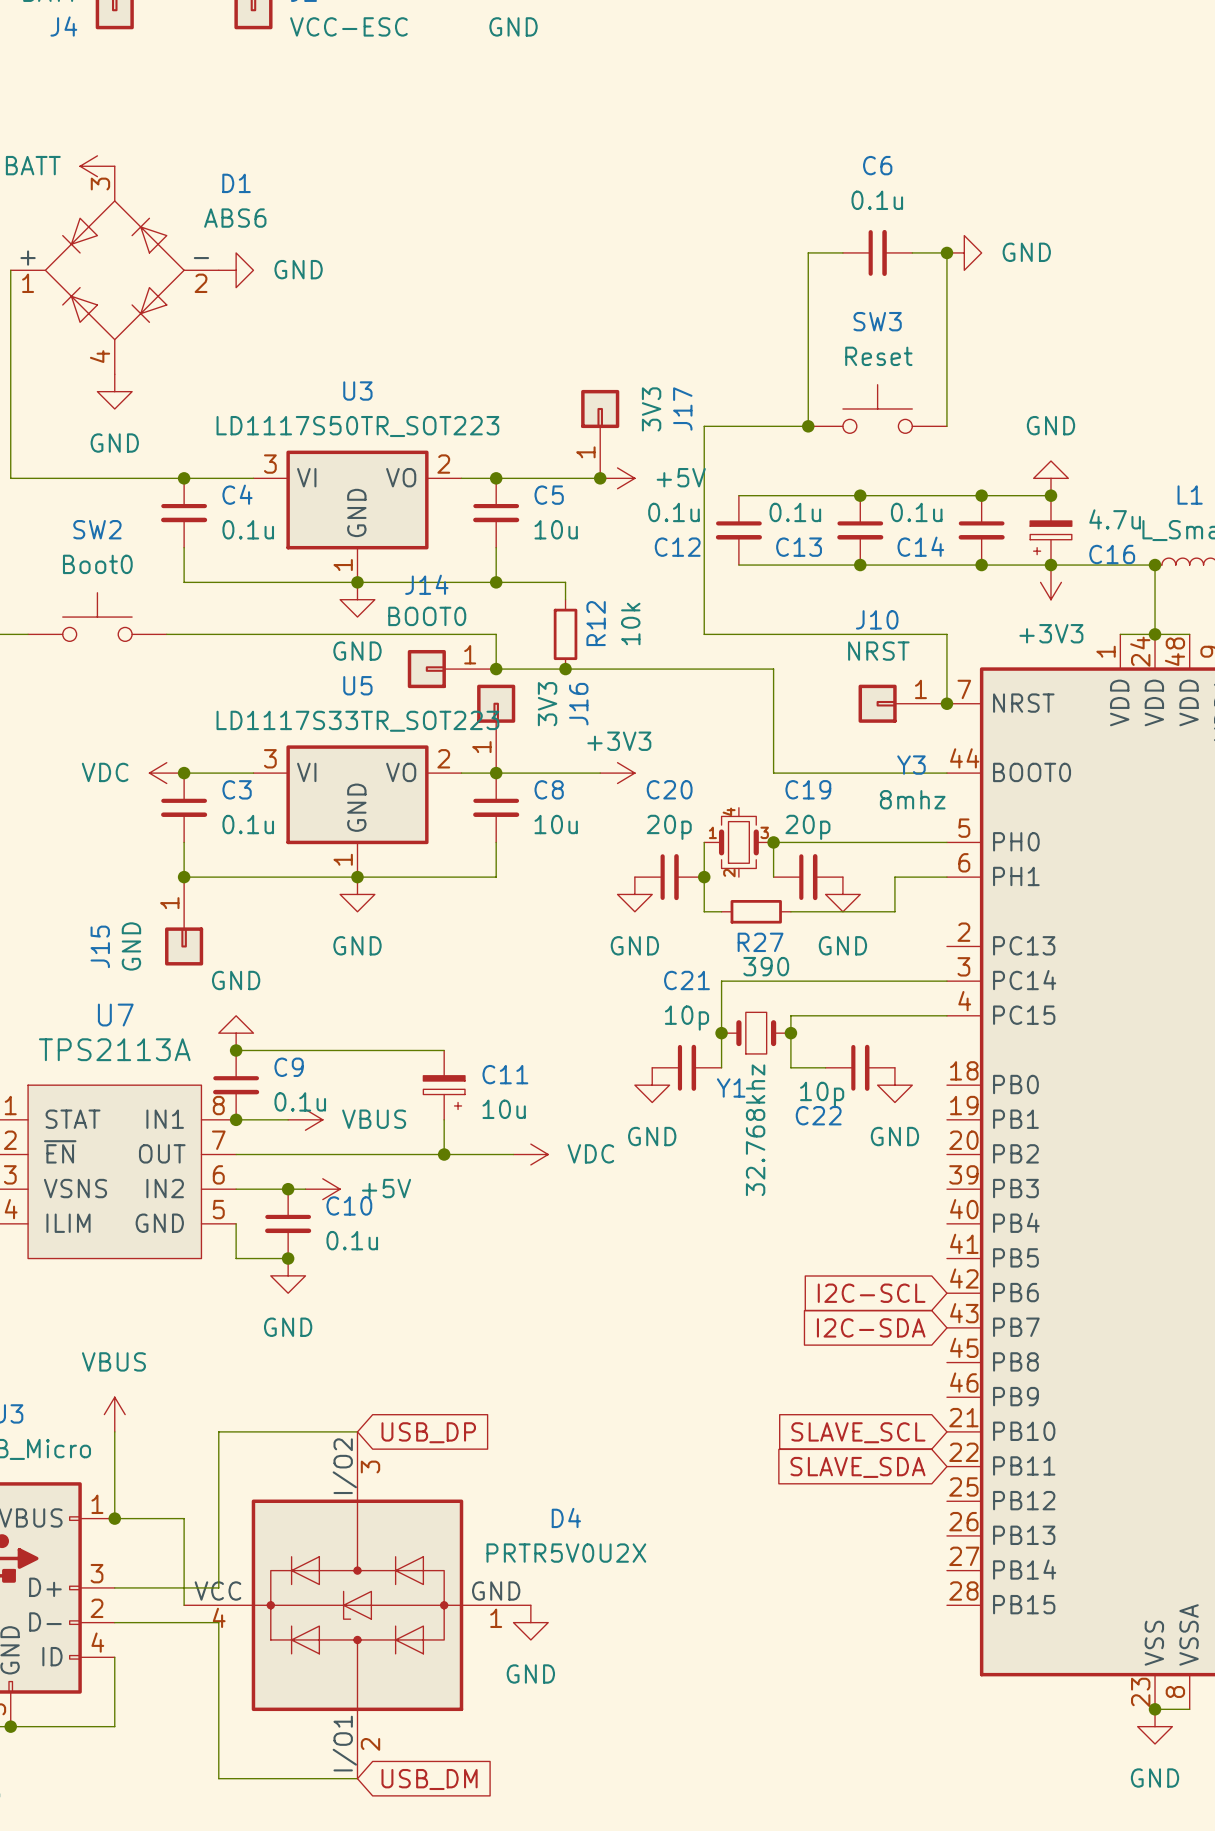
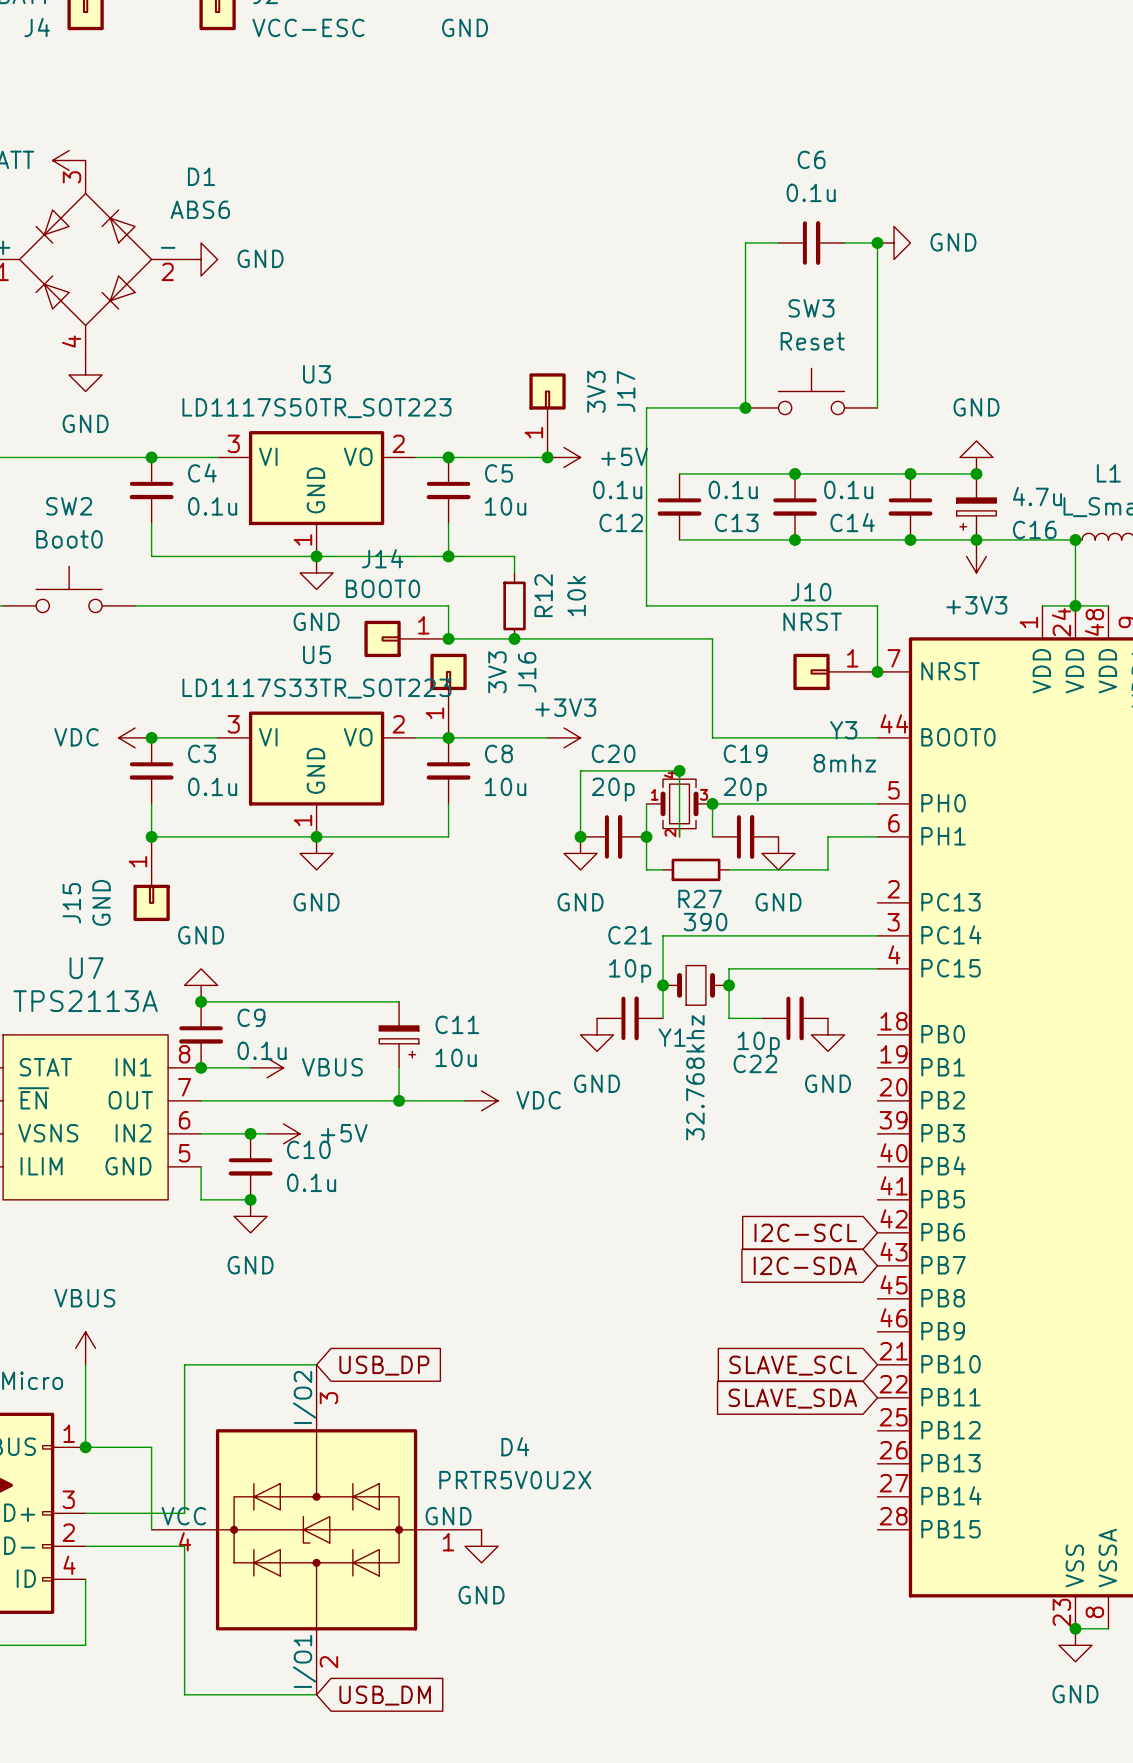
junction: none -> (679, 770)
wire: none -> (580, 836) (580, 770) (679, 770) (679, 836)
junction: none -> (580, 836)

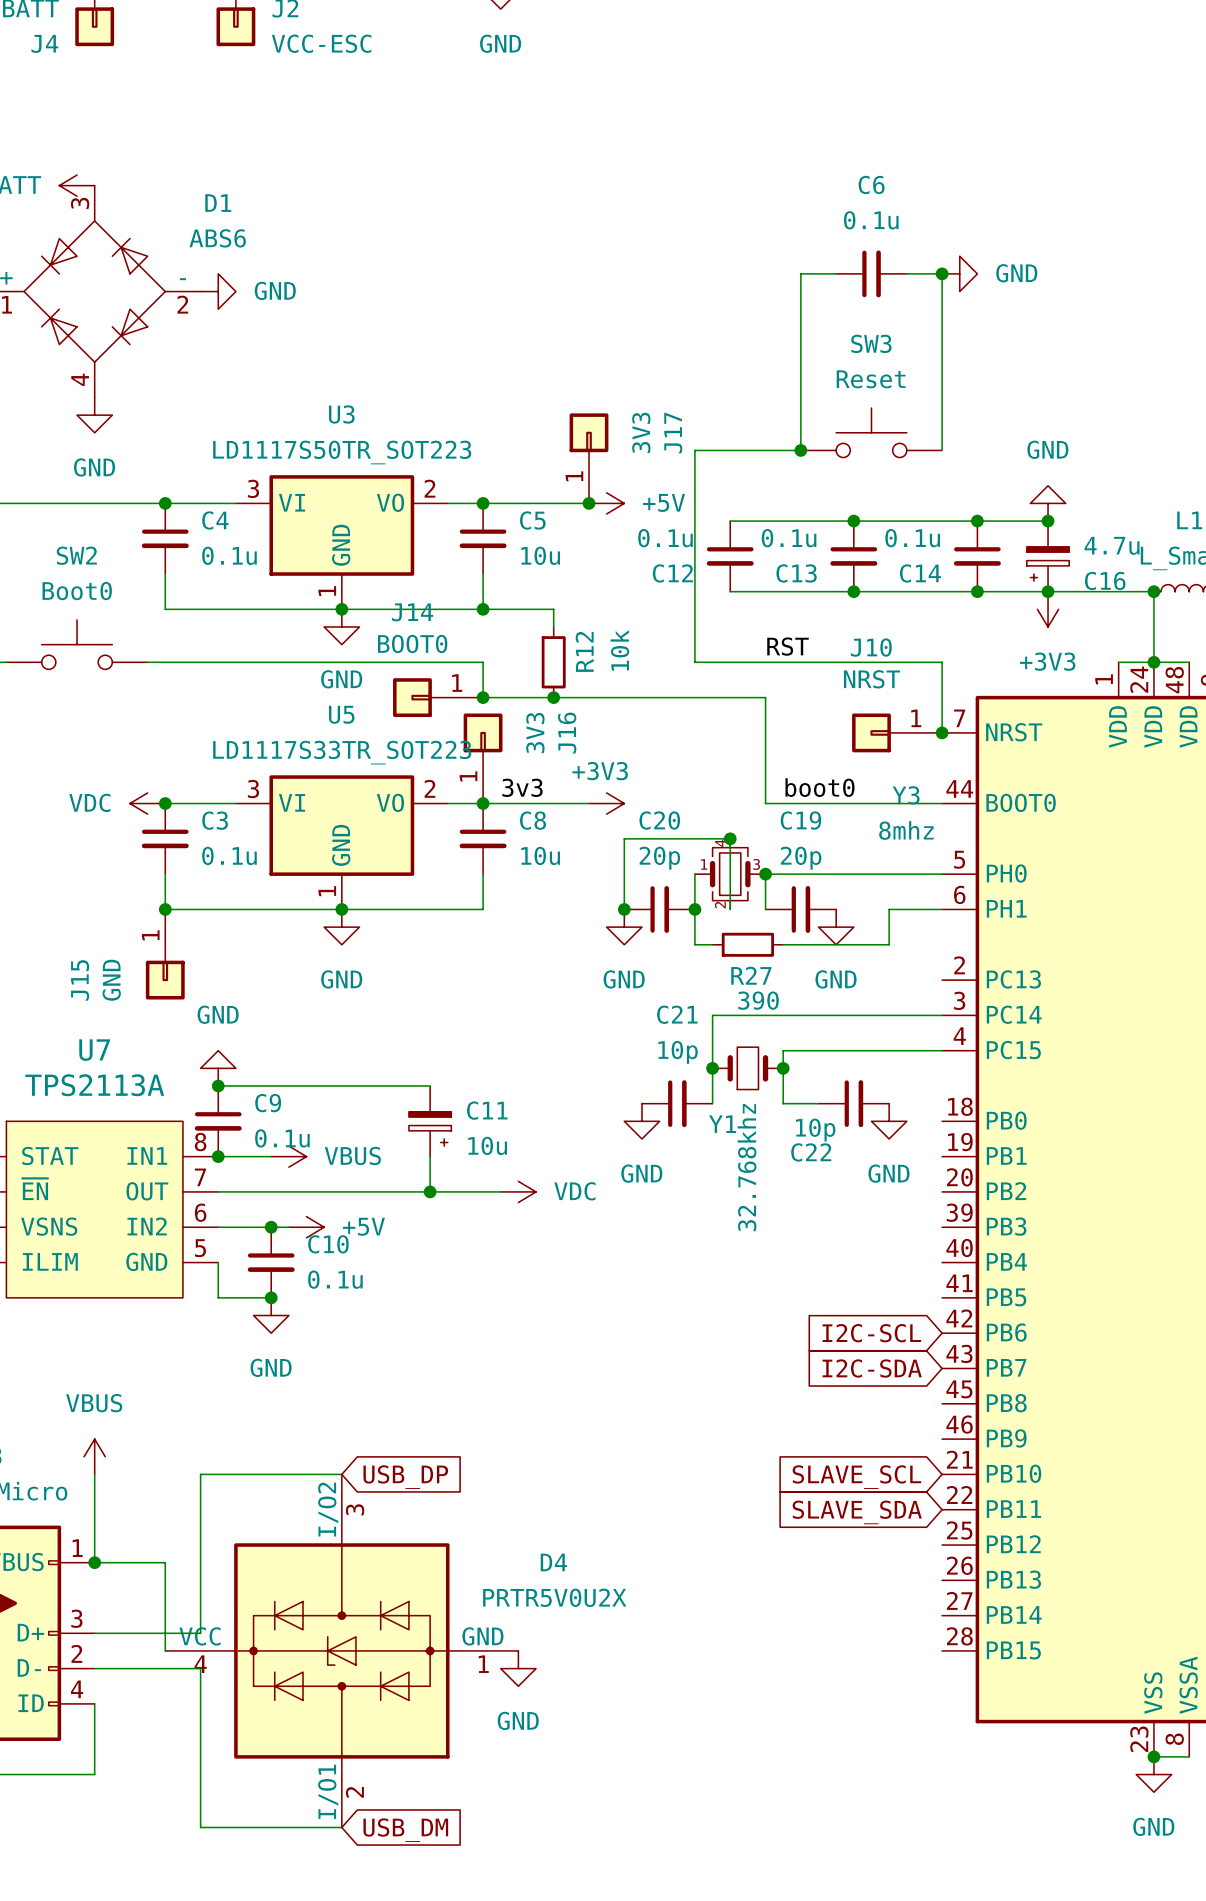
label: none -> RST (787, 646)
label: none -> 3v3 (522, 787)
label: none -> boot0 (820, 787)

